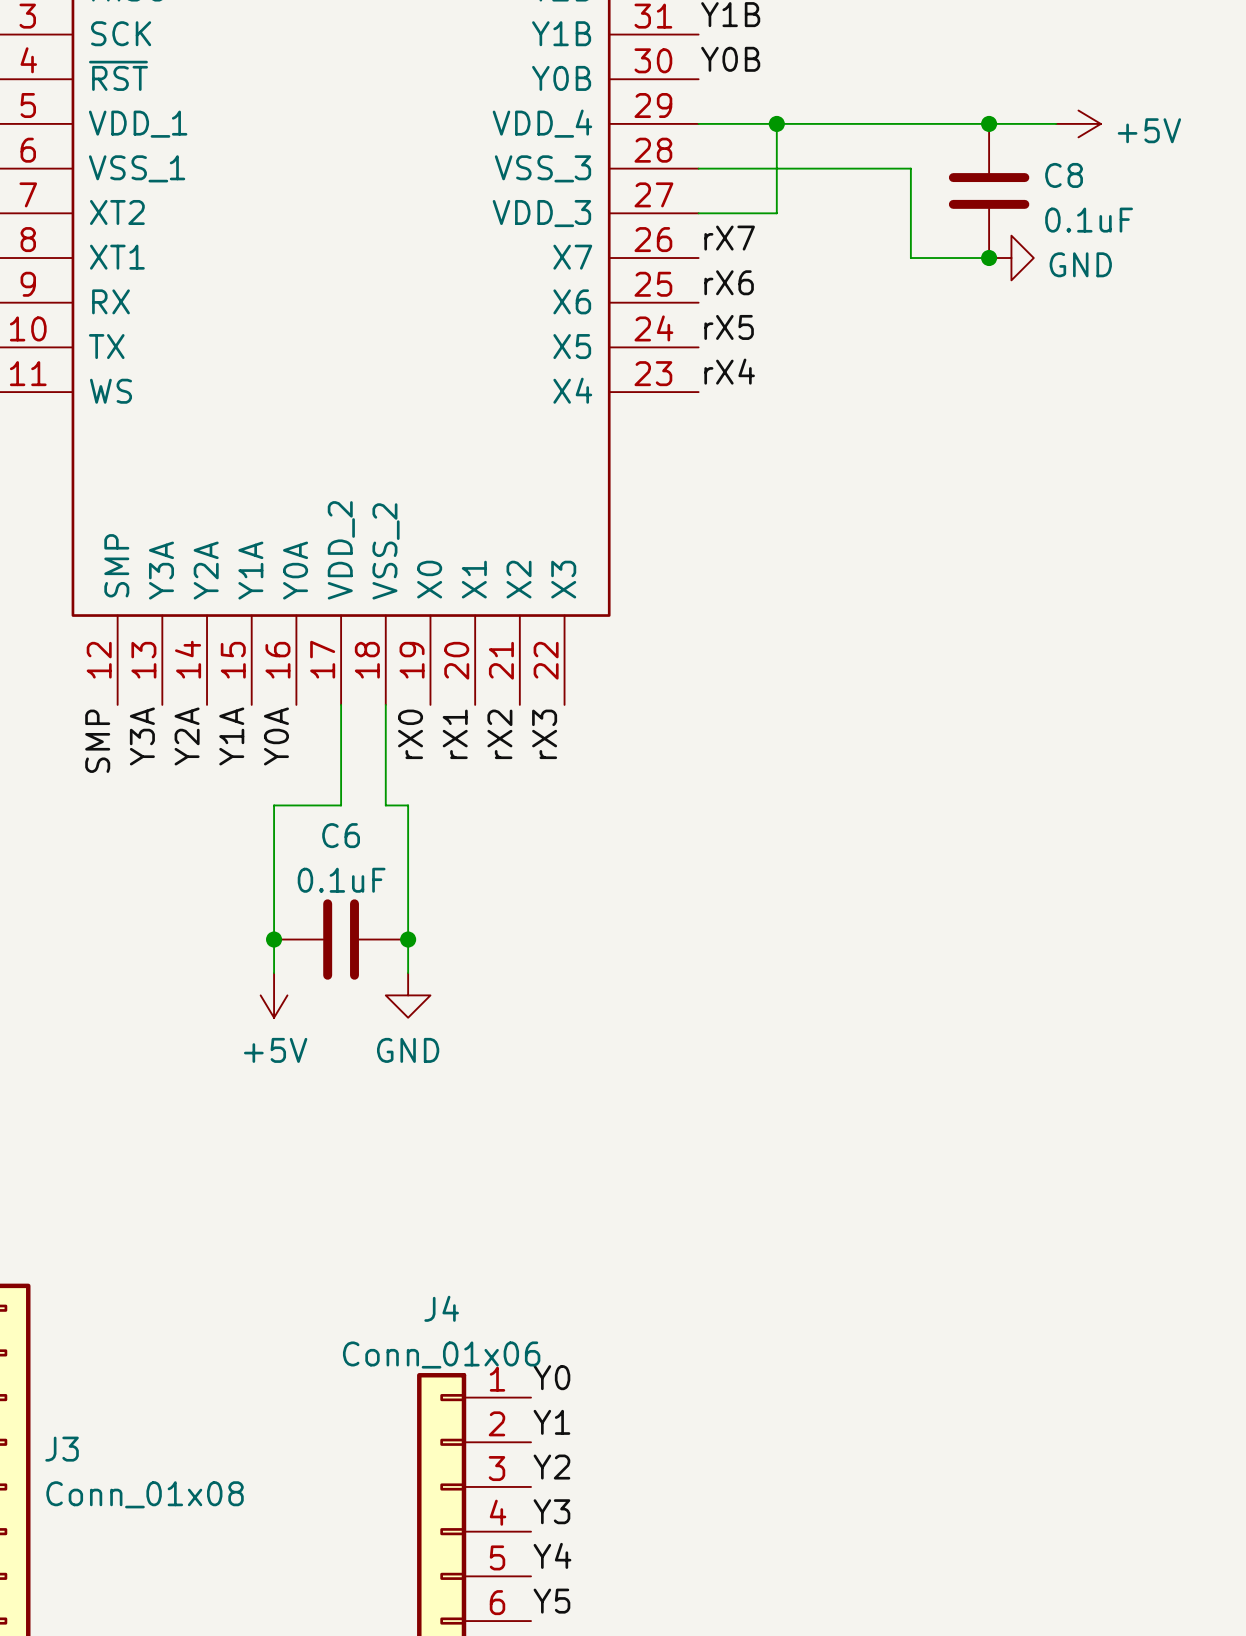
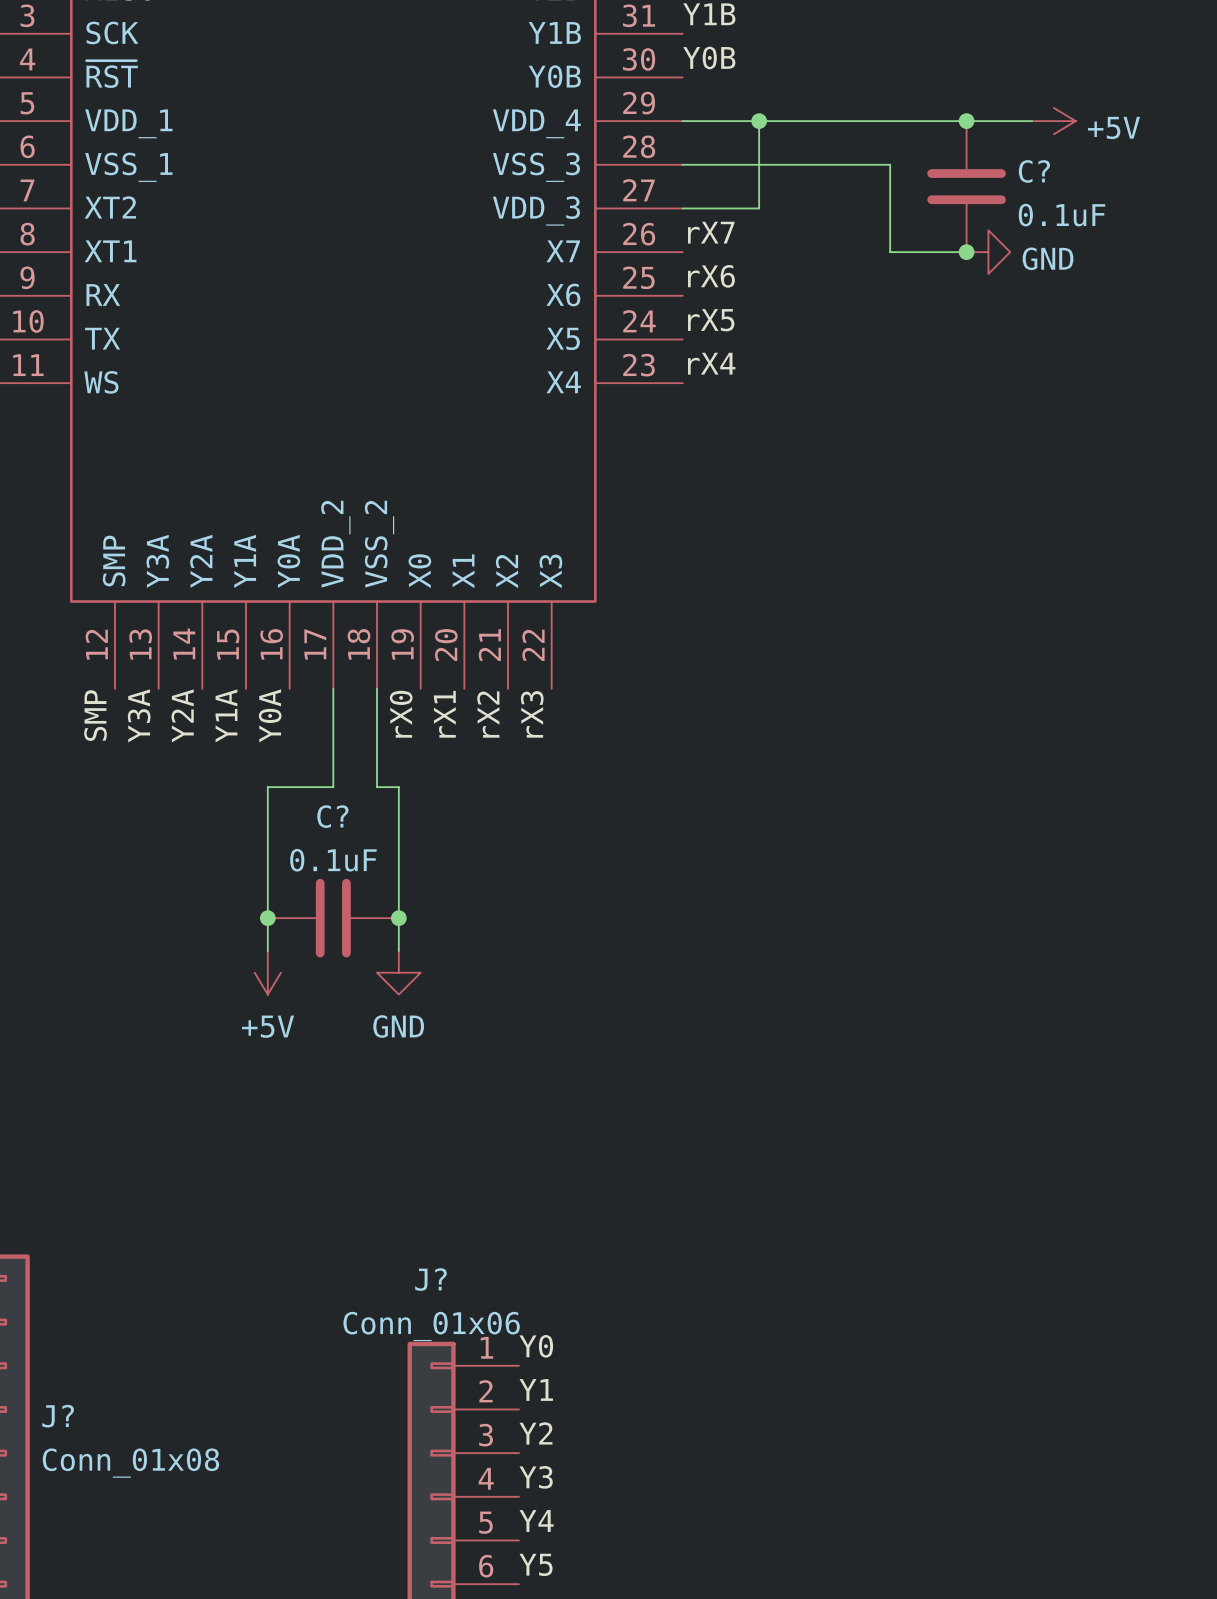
C8 name: C8 (1064, 175) -> C? (1034, 171)
C6 name: C6 (341, 835) -> C? (332, 816)
J4 name: J4 (441, 1308) -> J? (430, 1279)
J3 name: J3 (62, 1449) -> J? (58, 1416)

